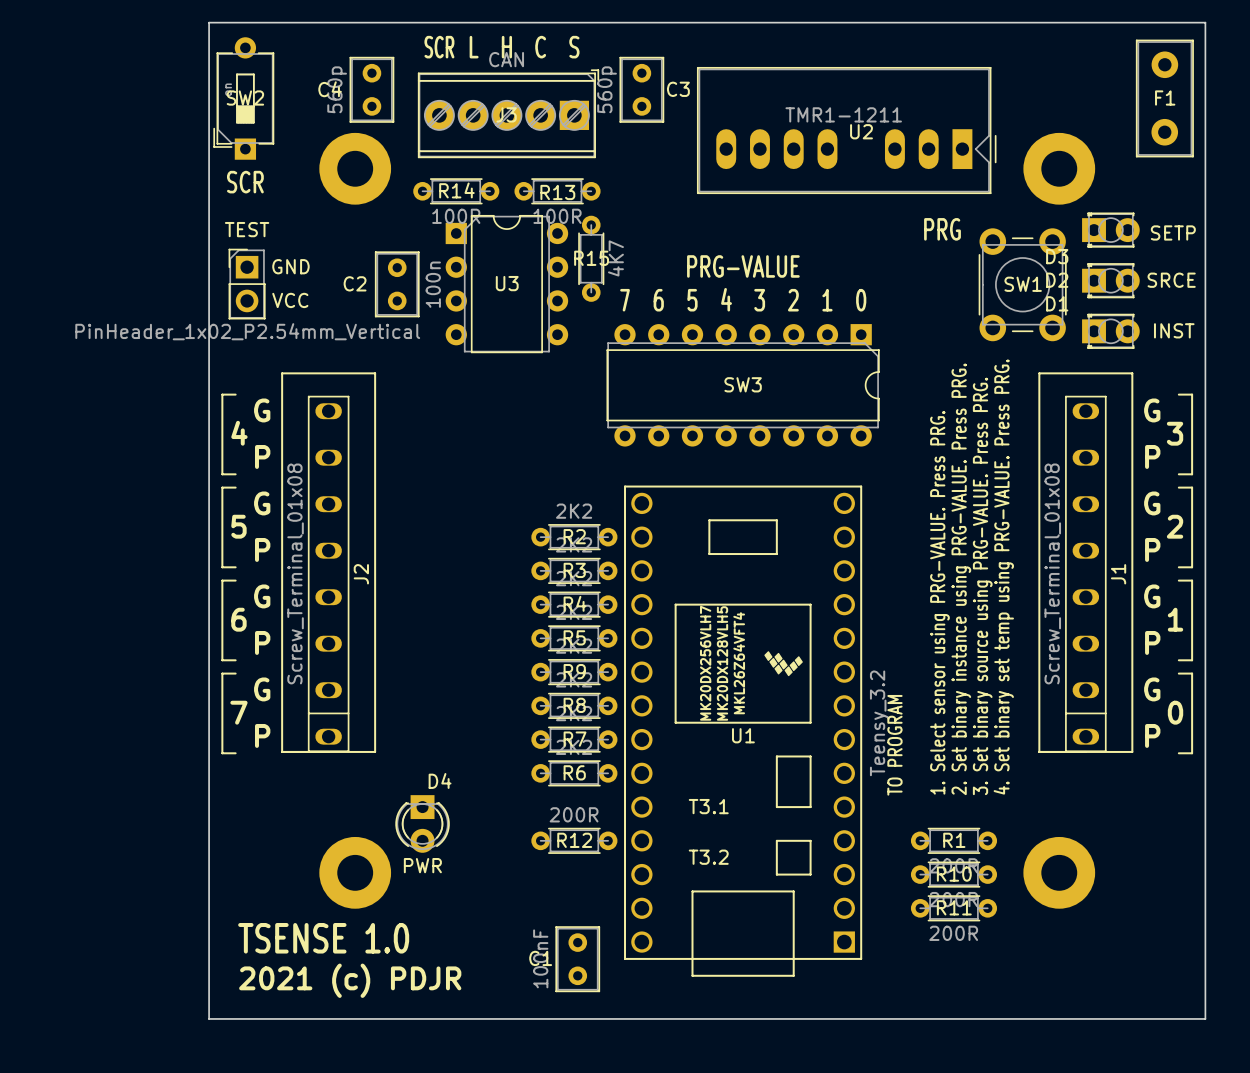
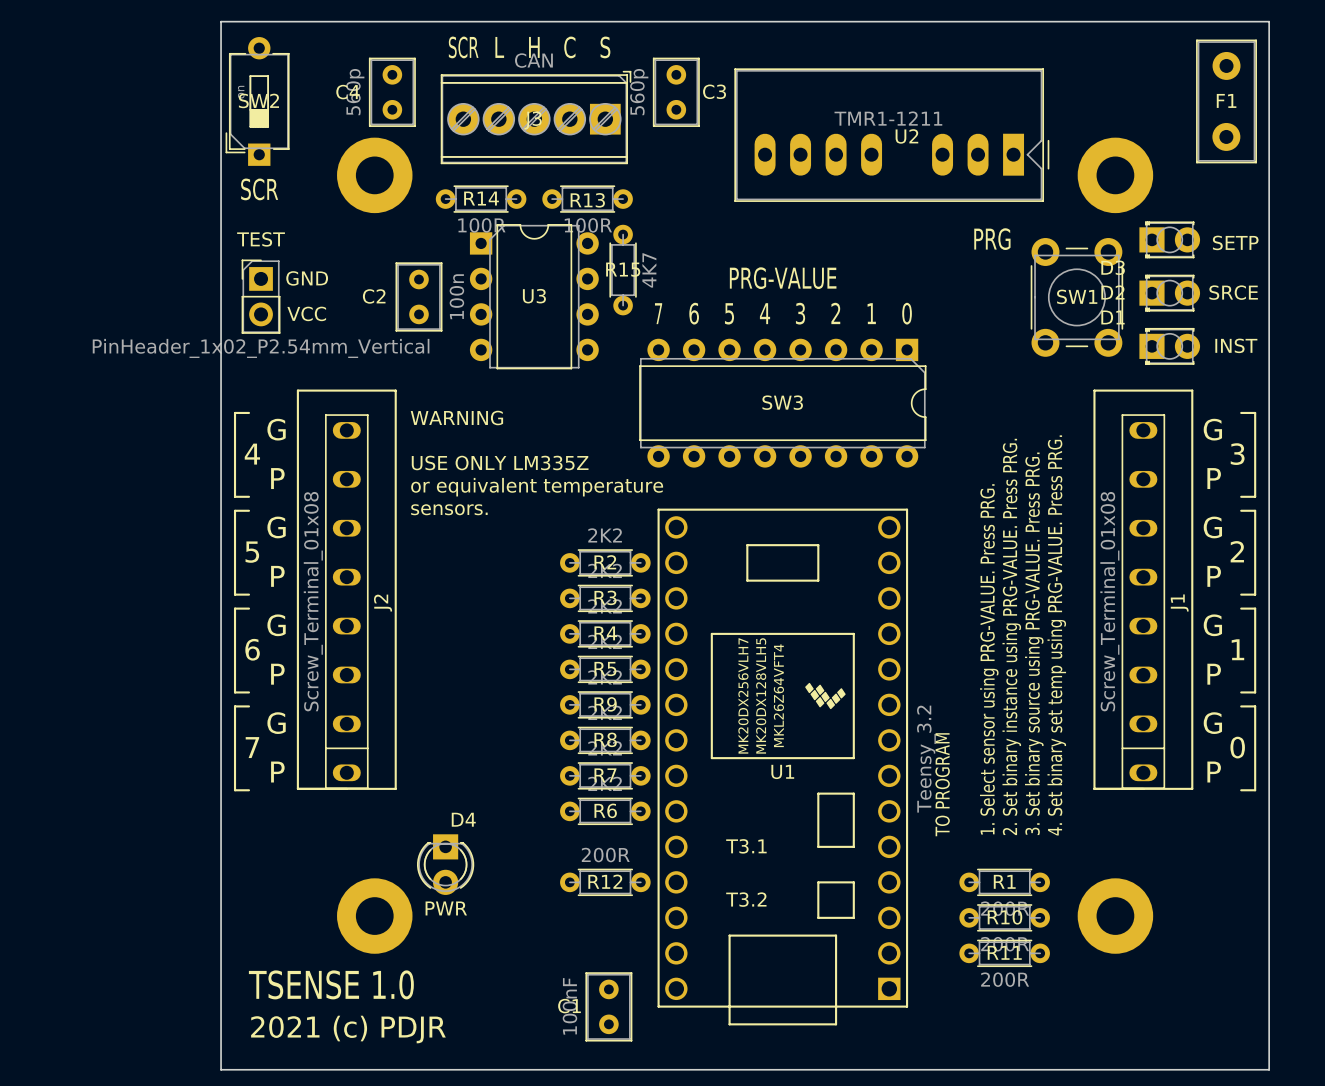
text: none -> WARNING (456, 418)
text: none -> USE ONLY LM335Z (500, 463)
text: none -> or equivalent temperature (537, 487)
text: none -> sensors. (449, 509)

